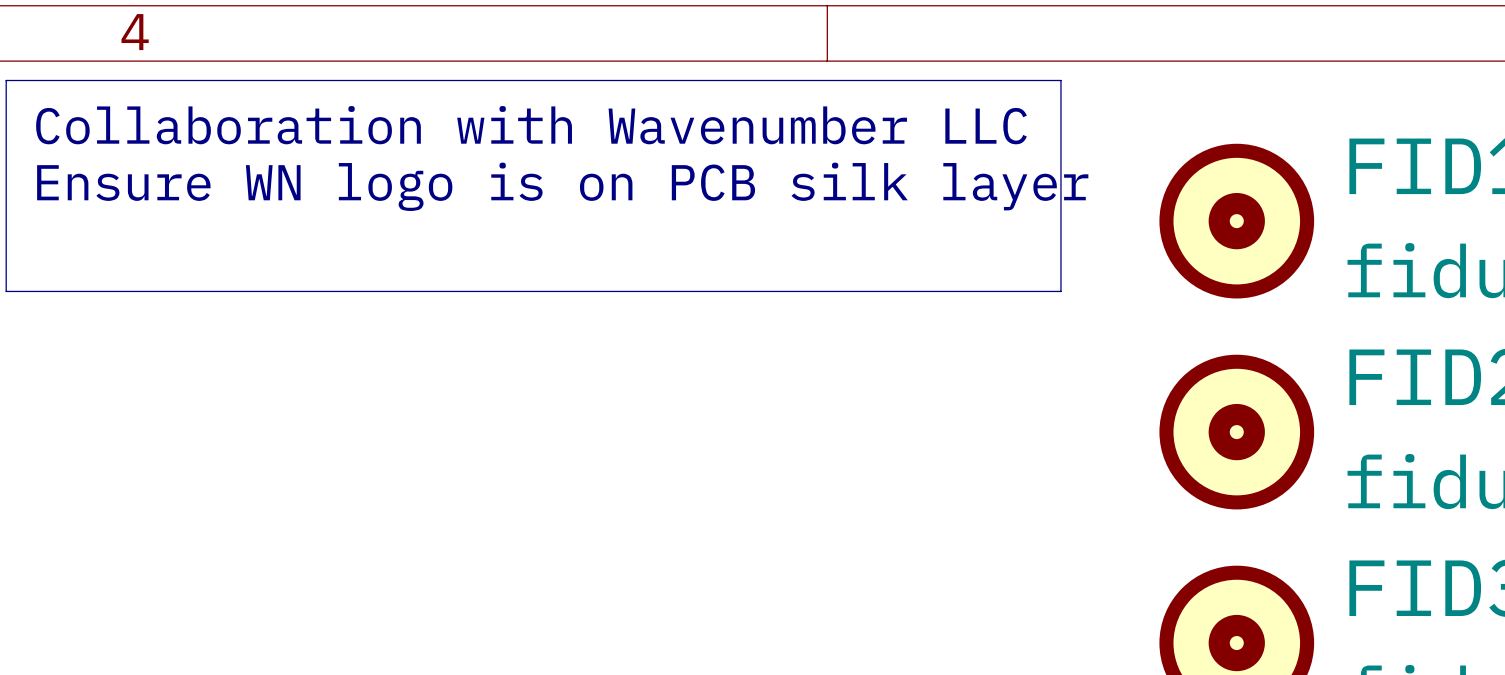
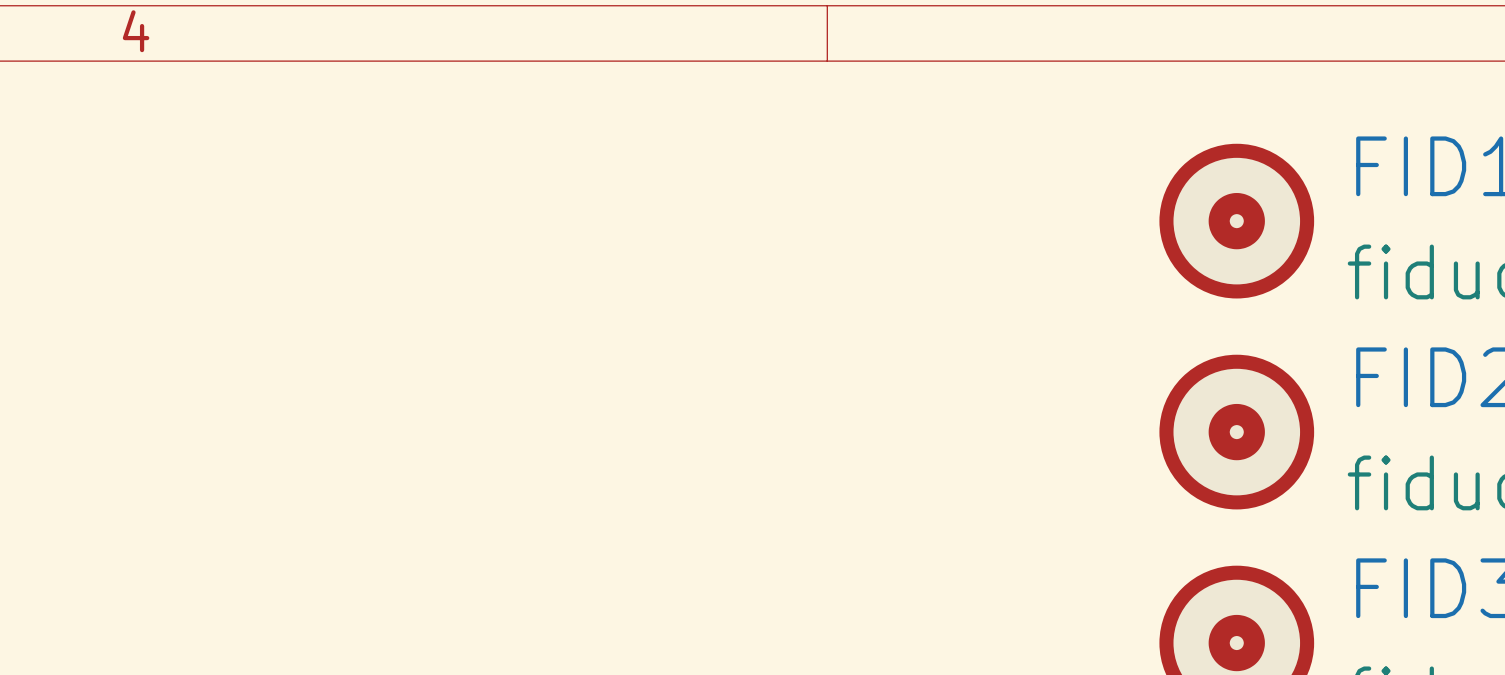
line: (6, 80) (1060, 80) (1060, 291) (6, 291) (6, 80) -> none
text: Collaboration with Wavenumber LLC (531, 125) -> none
text: Ensure WN logo is on PCB silk layer (562, 186) -> none

